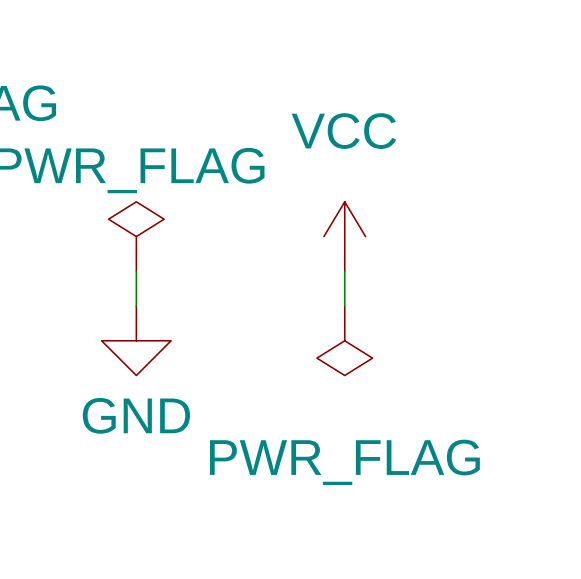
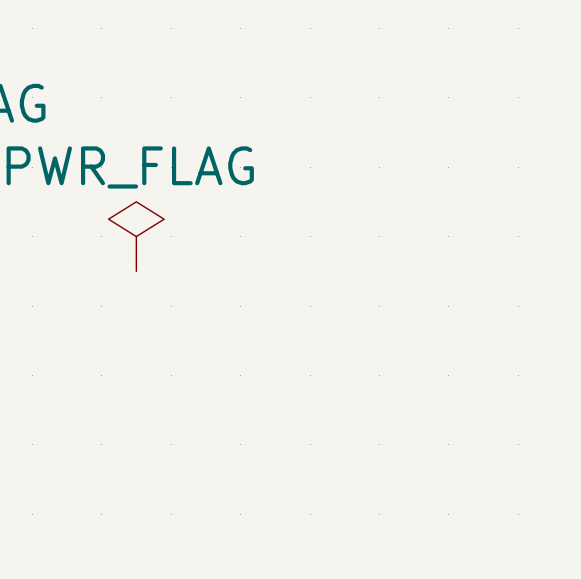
power symbol: VCC (344, 236) -> none
wire: (136, 271) (136, 306) -> none
wire: (344, 271) (344, 306) -> none
power symbol: GND (136, 340) -> none
power symbol: PWR_FLAG (344, 340) -> none

